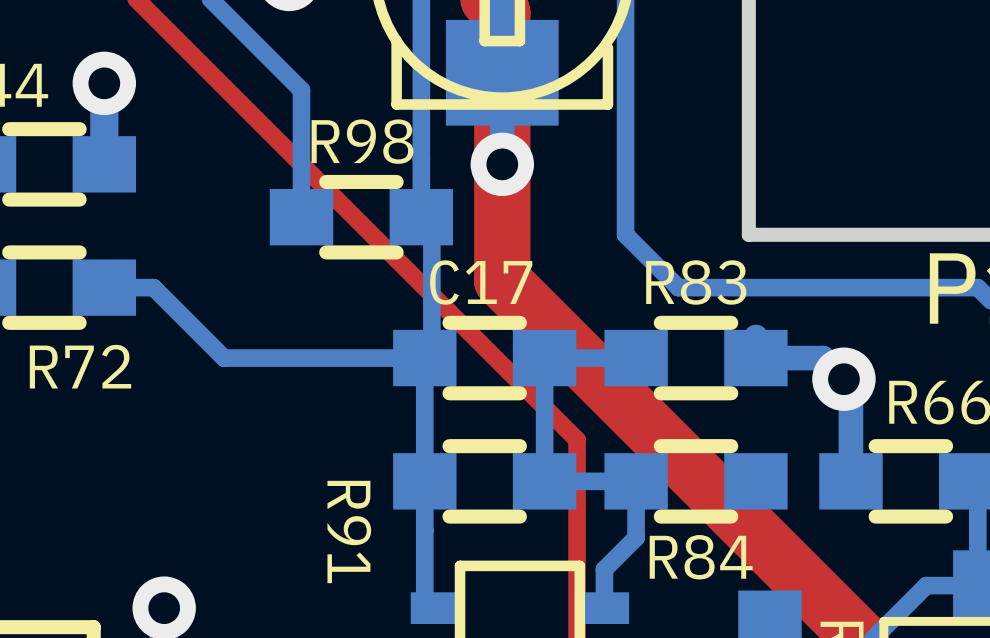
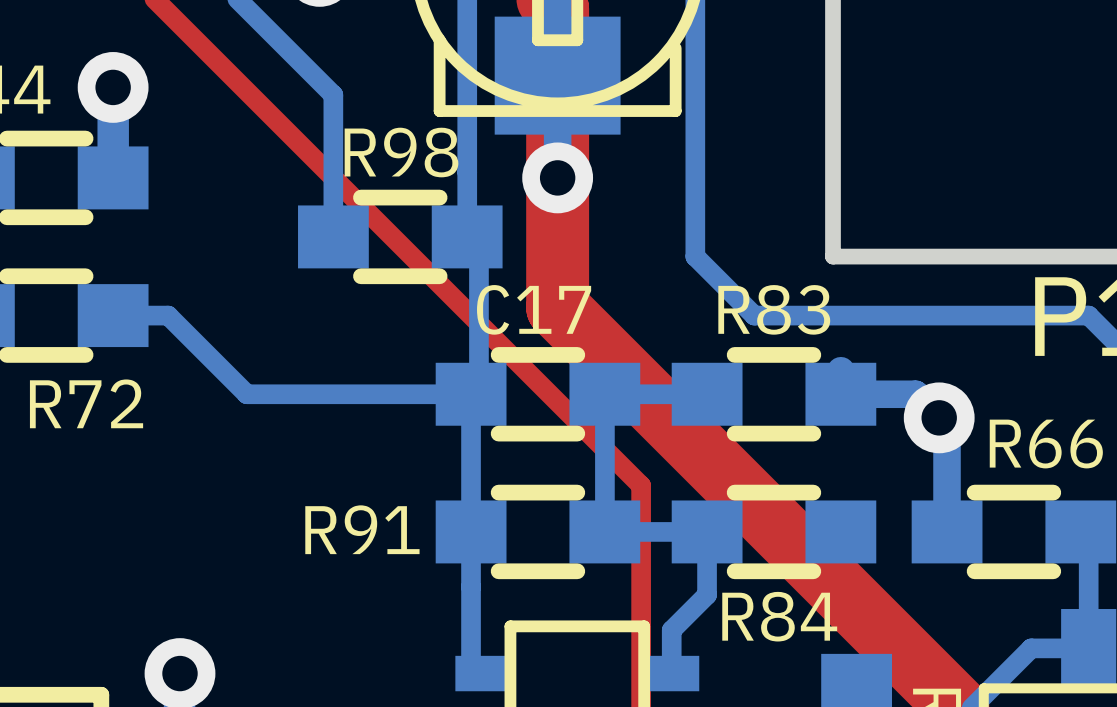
R91 name rotation: 0° (349, 531) -> 90° counterclockwise (362, 529)

